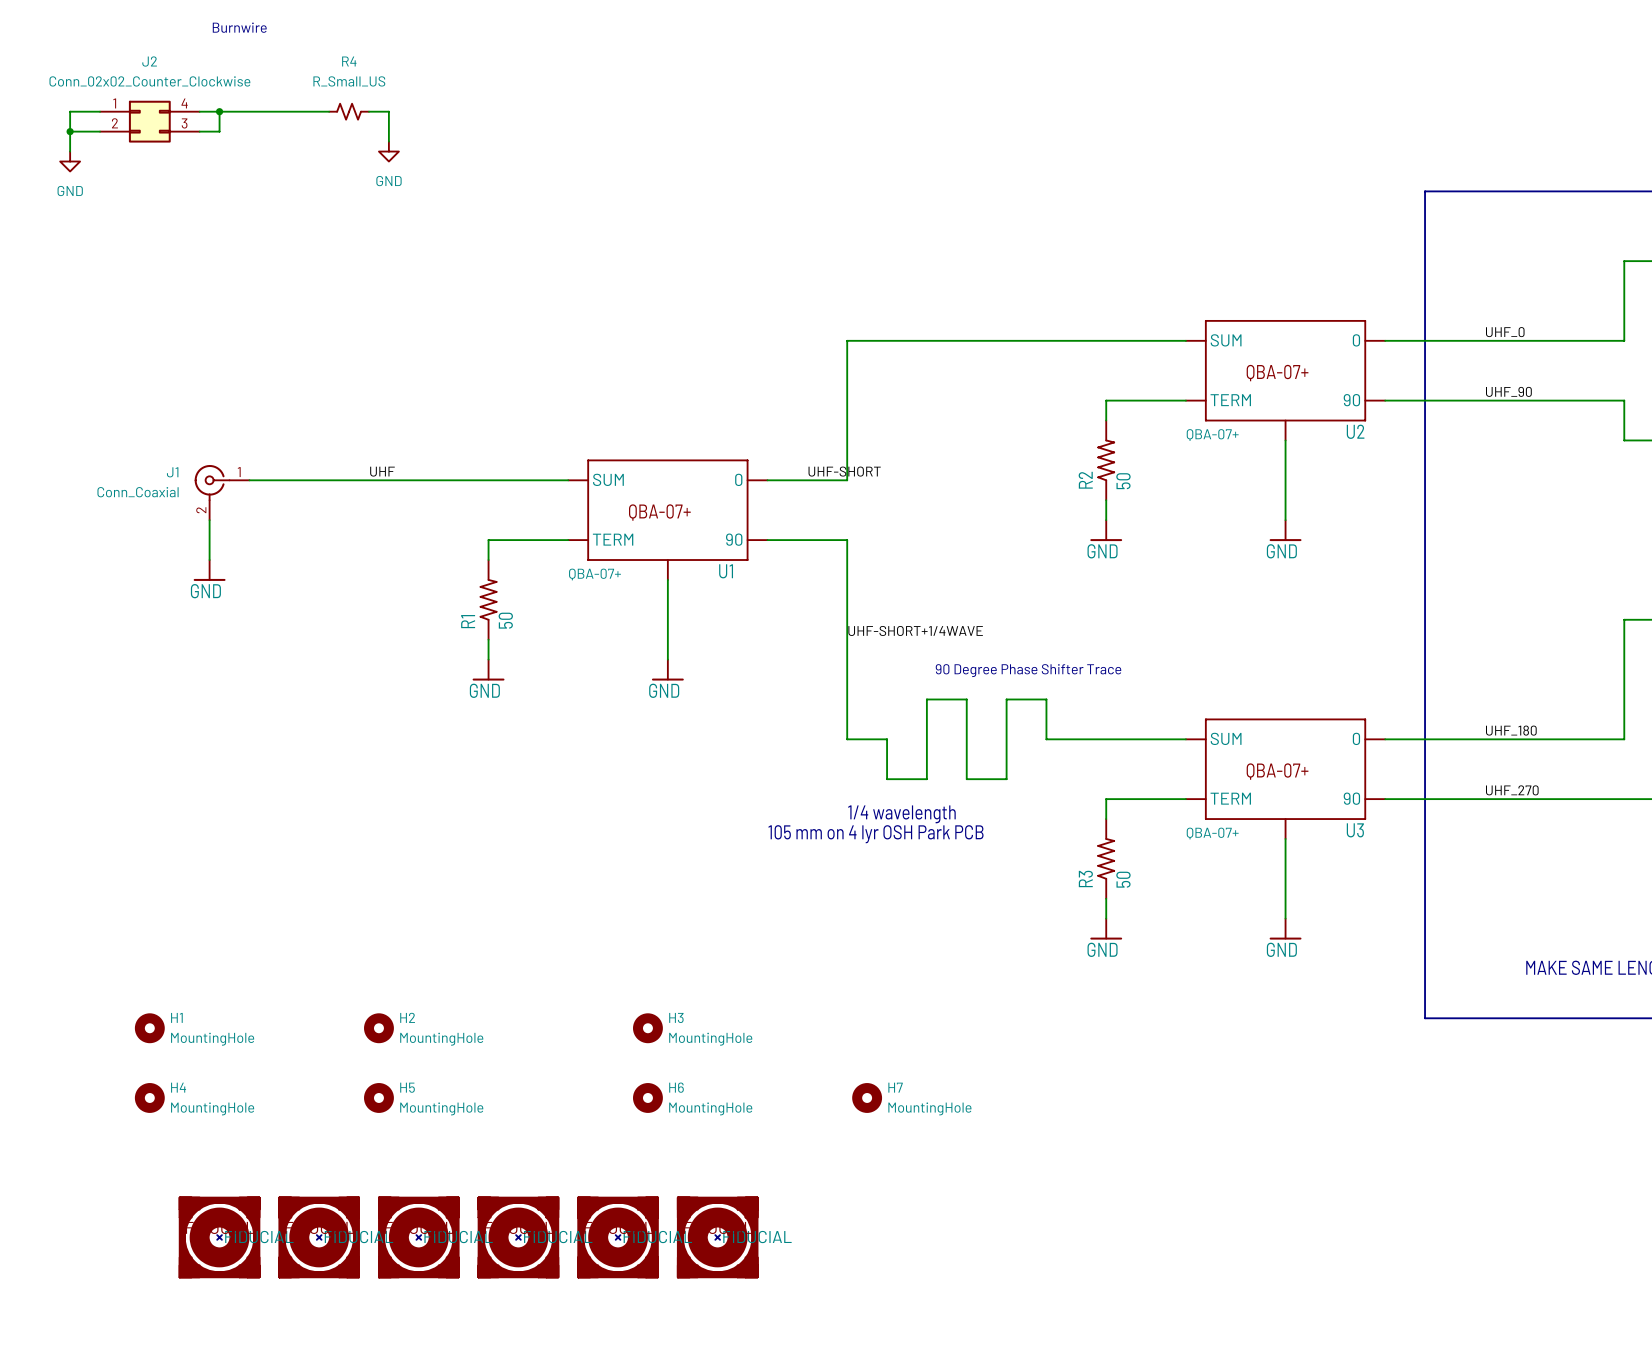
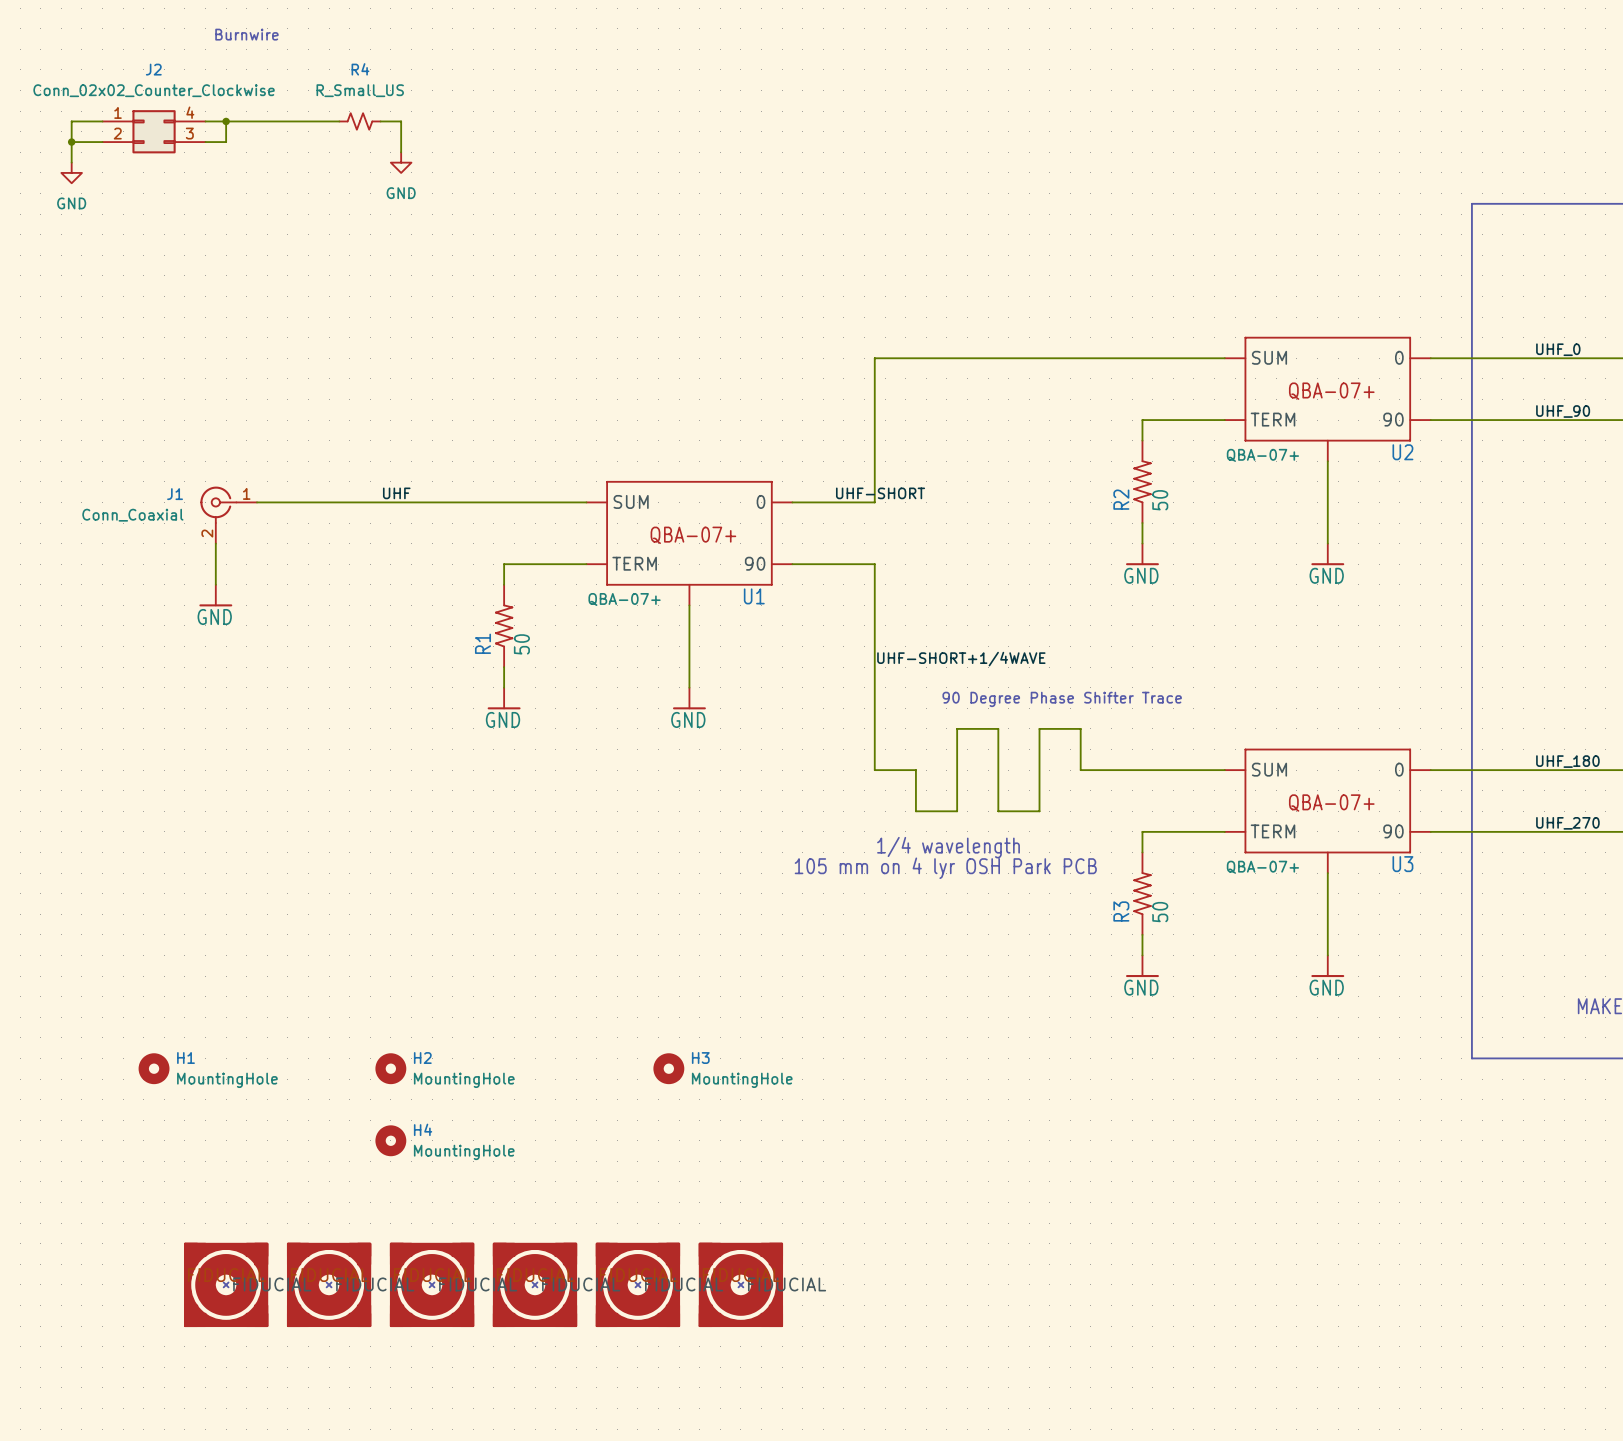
H5 name: H5 (407, 1087) -> H4 (423, 1129)
H4: MountingHole (149, 1097) -> none
H6: MountingHole (647, 1097) -> none
H7: MountingHole (867, 1097) -> none

